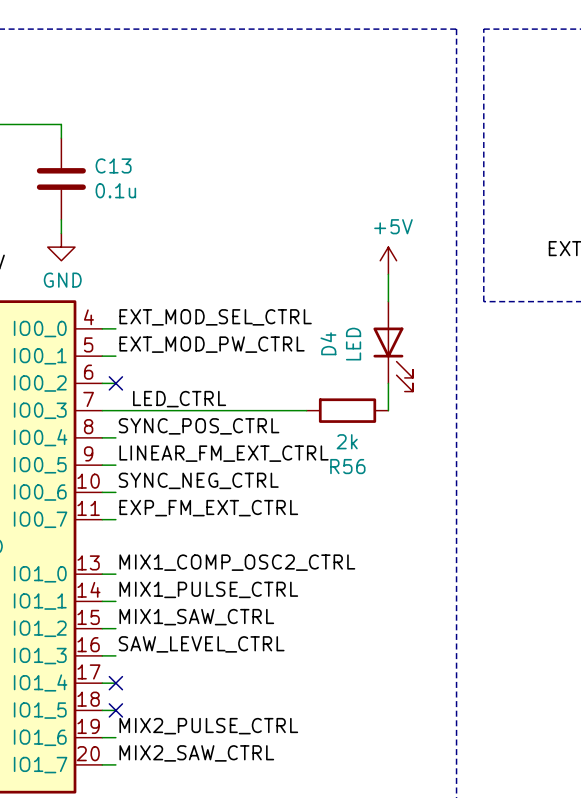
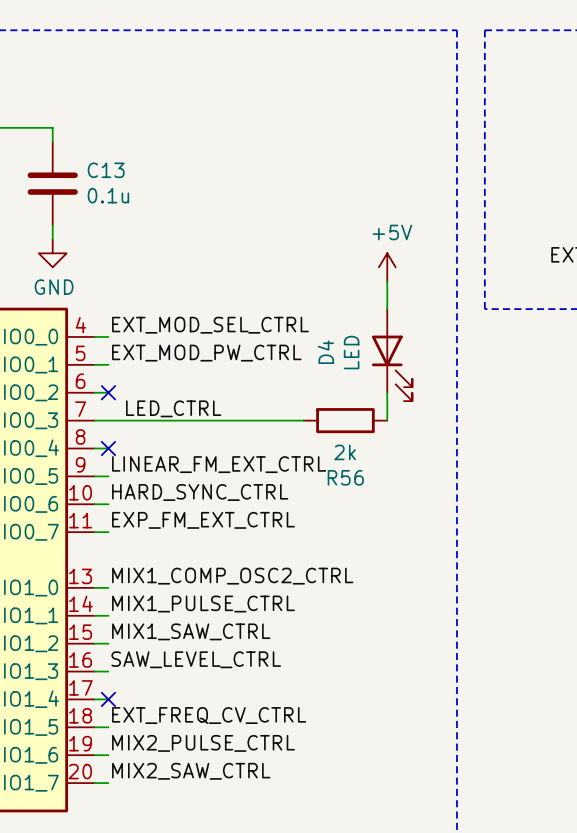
label: SYNC_POS_CTRL (199, 426) -> none
no-connect mark: none -> (108, 448)
label: SYNC_NEG_CTRL (198, 480) -> HARD_SYNC_CTRL (200, 492)
label: none -> EXT_FREQ_CV_CTRL (209, 715)
no-connect mark: (115, 710) -> none

